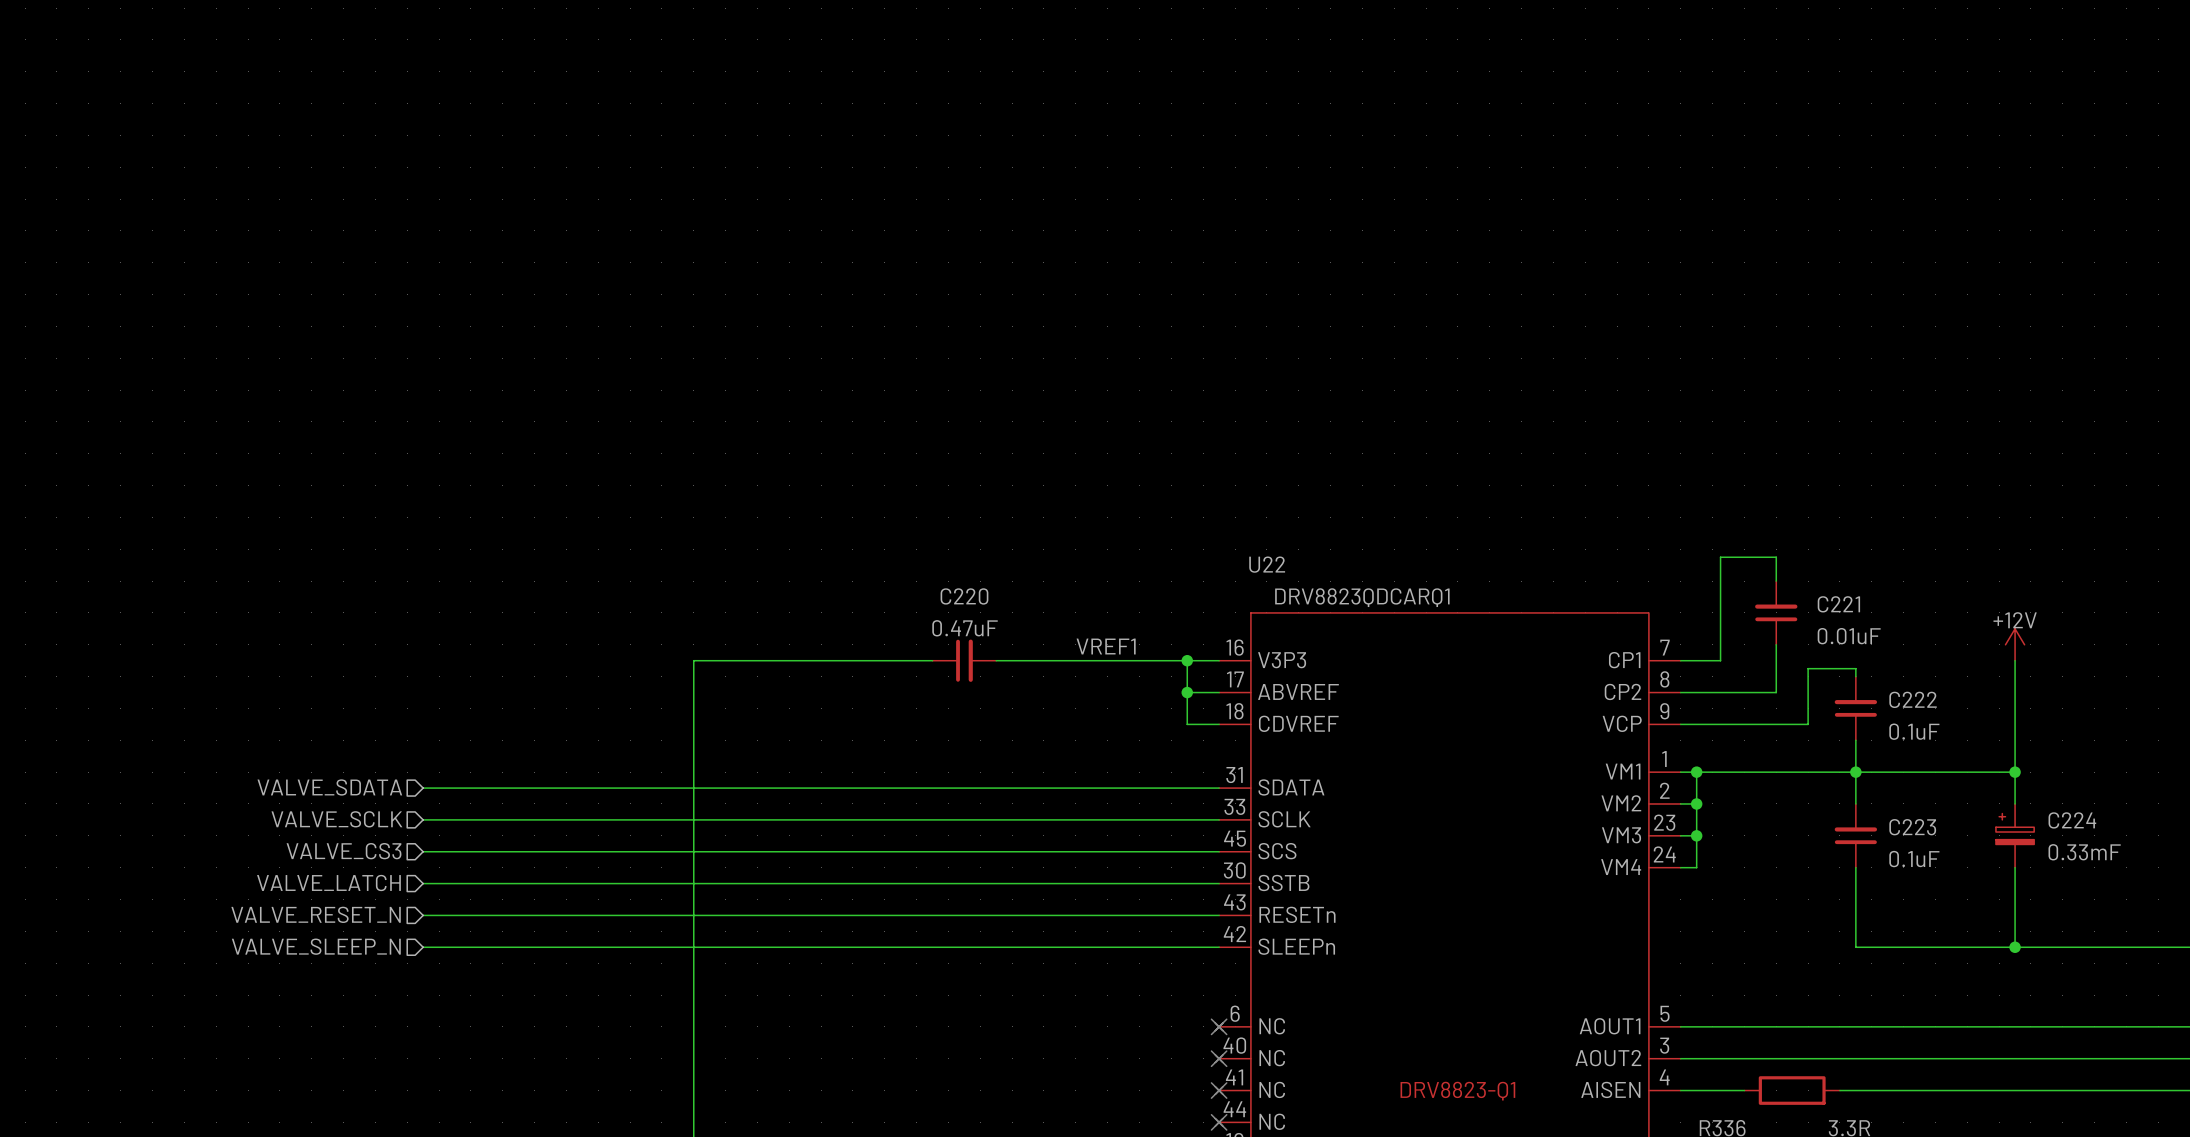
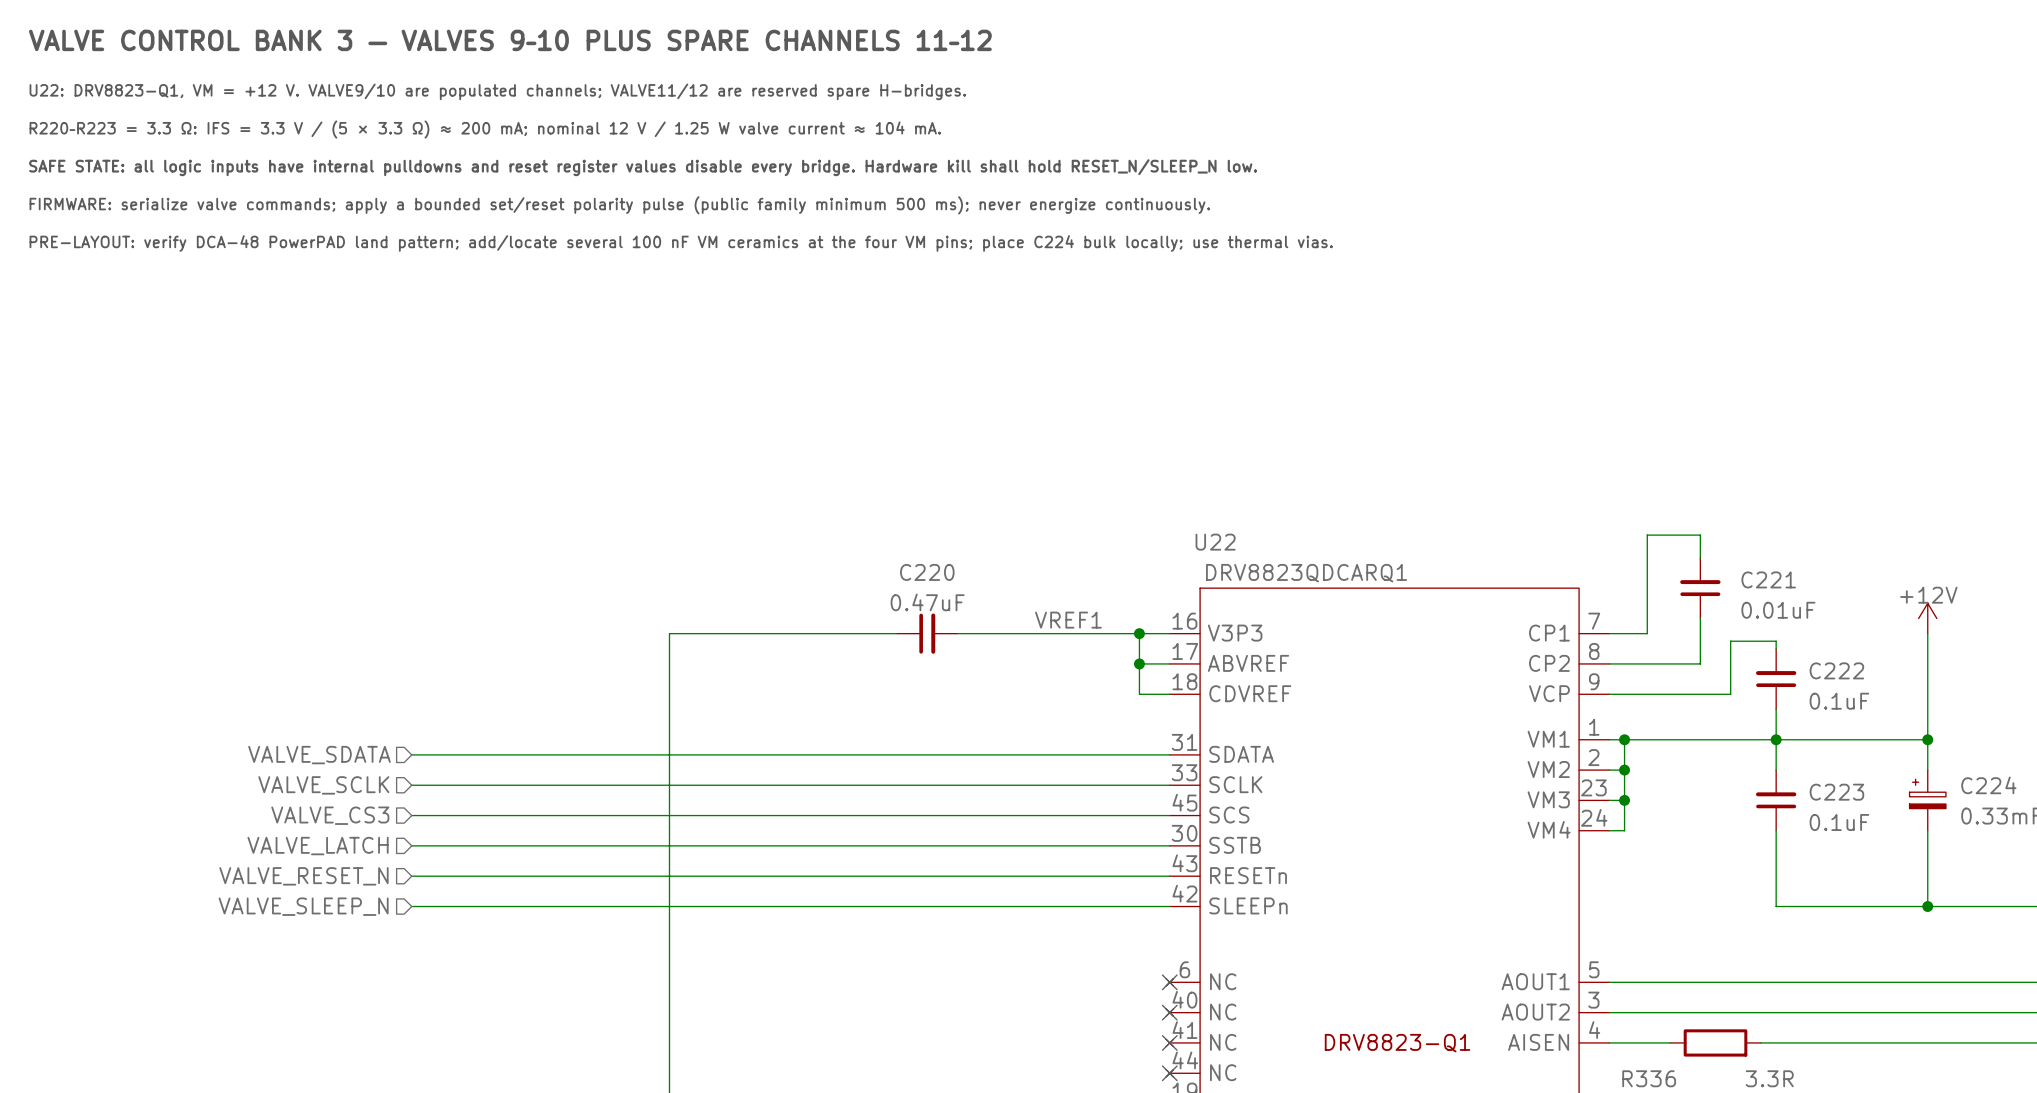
text: none -> VALVE CONTROL BANK 3 — VALVES 9–10 PLUS SPARE CHANNELS 11–12 (510, 40)
text: none -> U22: DRV8823-Q1, VM = +12 V. VALVE9/10 are populated channels; VALVE11/12 are reserved spare H-bridges. (497, 91)
text: none -> R220–R223 = 3.3 Ω: IFS = 3.3 V / (5 × 3.3 Ω) ≈ 200 mA; nominal 12 V / 1.25 W valve current ≈ 104 mA. (485, 129)
text: none -> SAFE STATE: all logic inputs have internal pulldowns and reset register values disable every bridge. Hardware kill shall hold RESET_N/SLEEP_N low. (643, 167)
text: none -> FIRMWARE: serialize valve commands; apply a bounded set/reset polarity pulse (public family minimum 500 ms); never energize continuously. (619, 205)
text: none -> PRE-LAYOUT: verify DCA-48 PowerPAD land pattern; add/locate several 100 nF VM ceramics at the four VM pins; place C224 bulk locally; use thermal vias. (681, 243)

